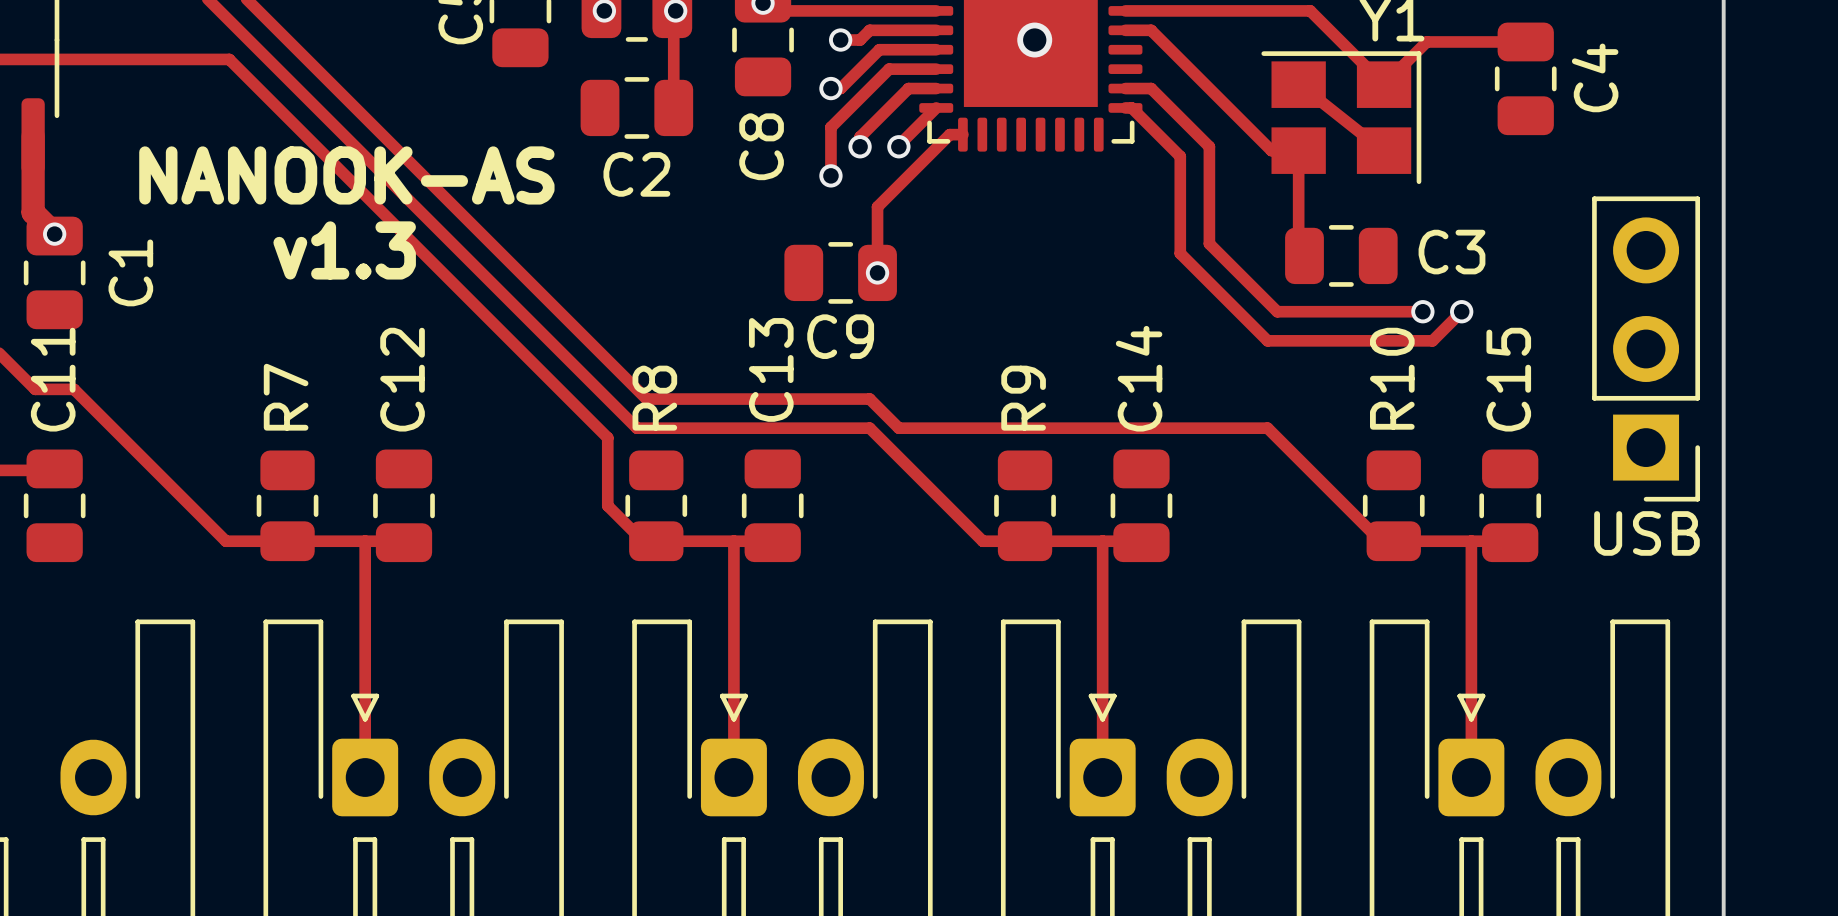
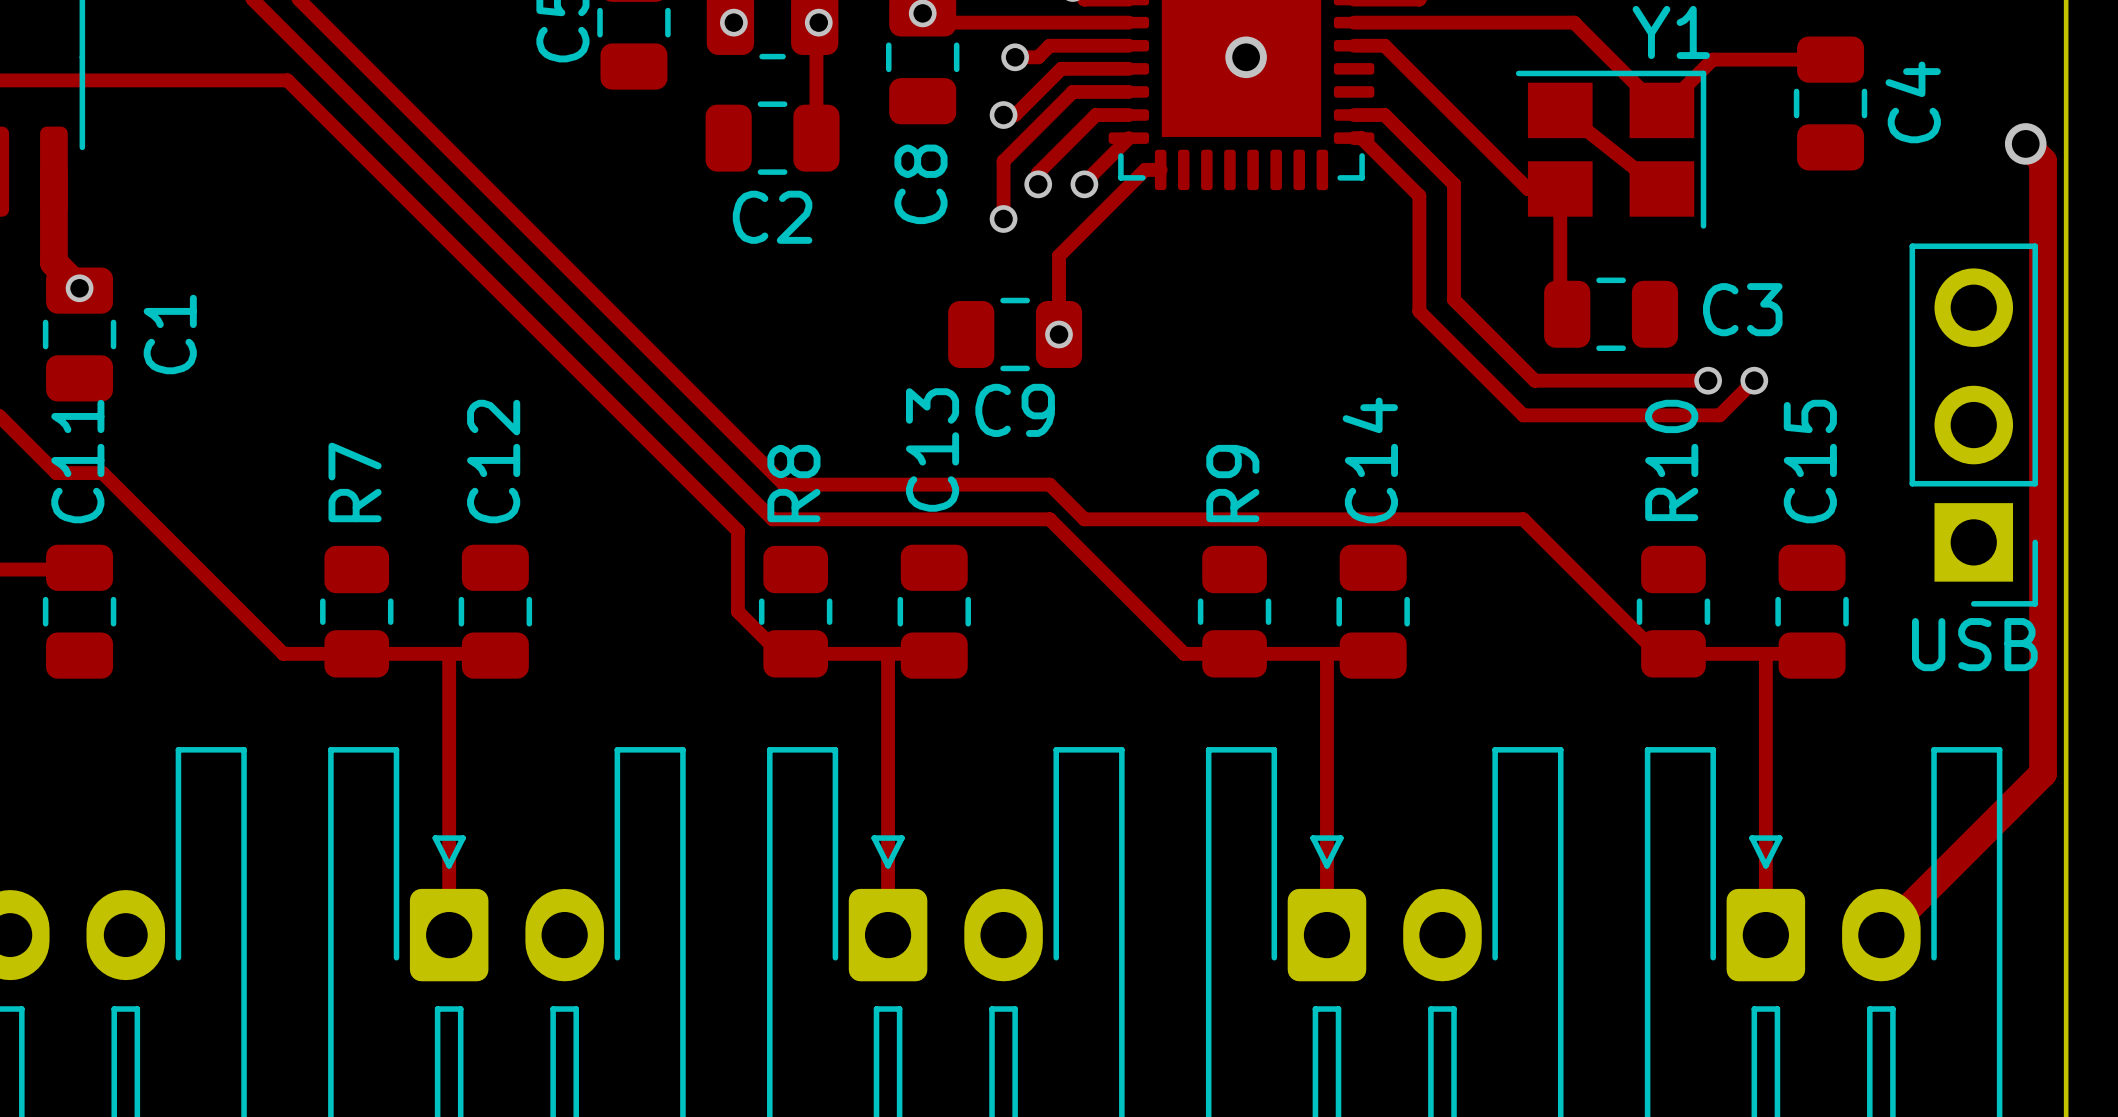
track: none -> (2025, 143) (2043, 161) (2043, 773) (1881, 935)
via: none -> (2025, 143)
text: NANOOK-AS (346, 175) -> none
text: v1.3 (344, 250) -> none

